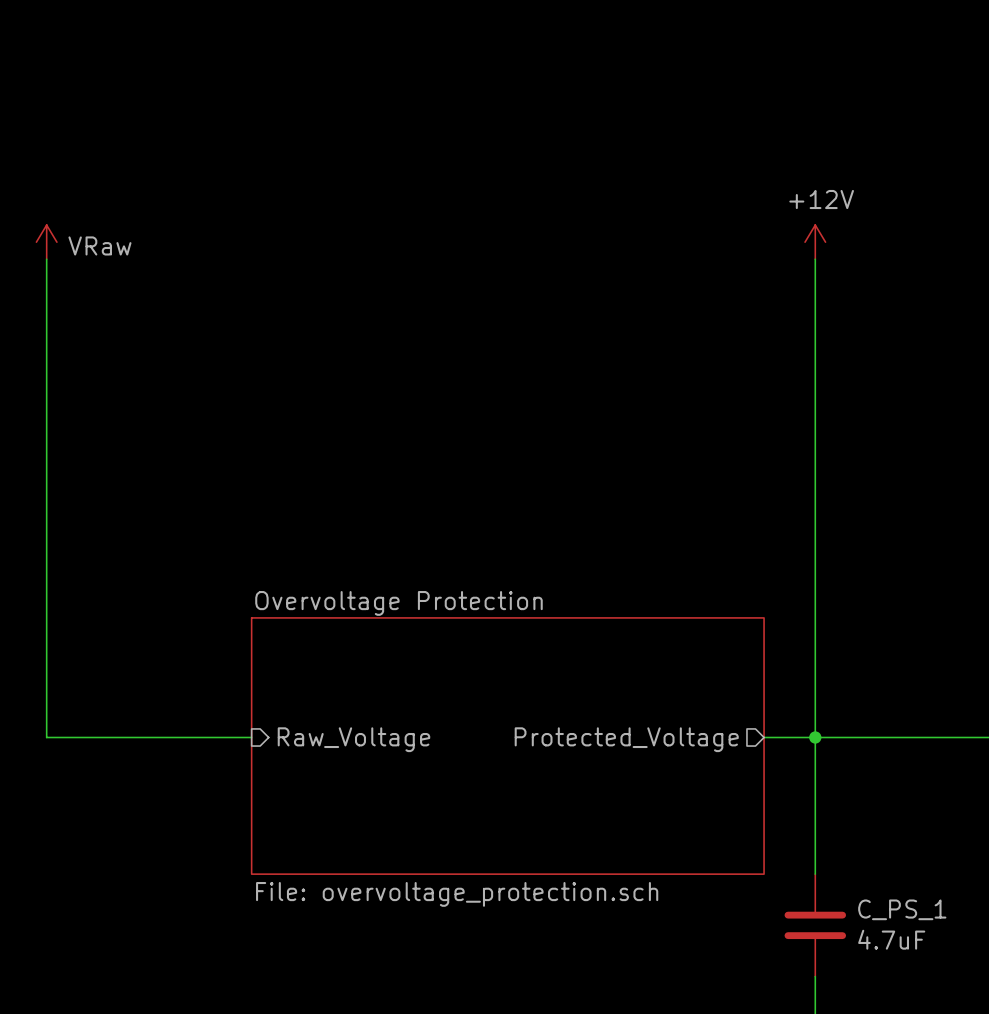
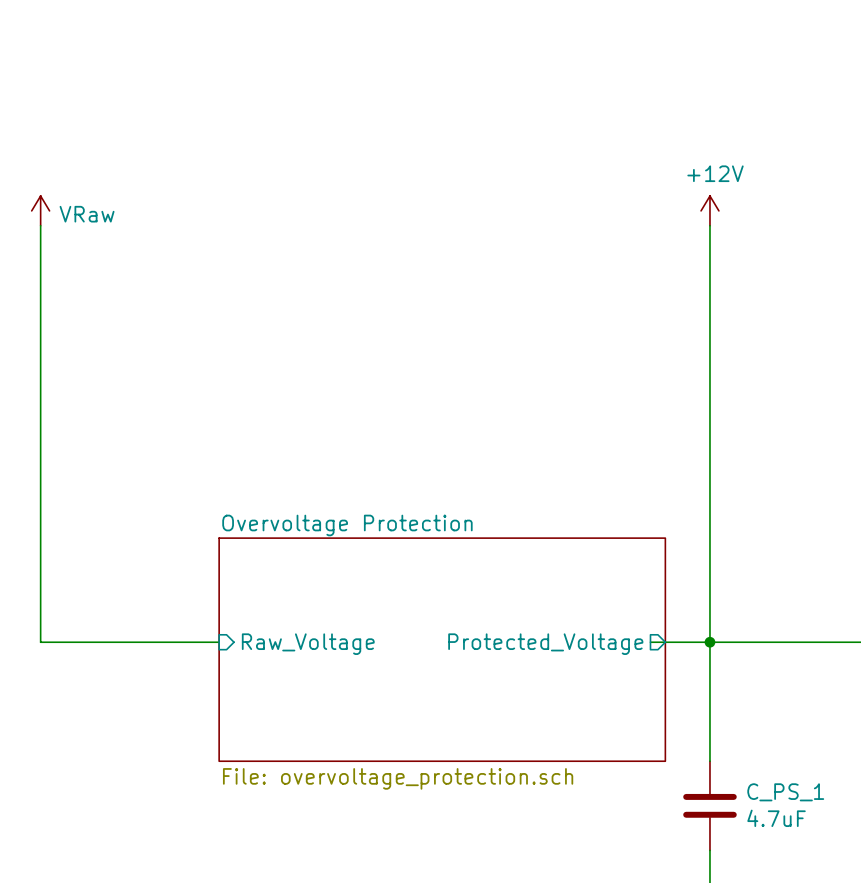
wire: none -> (650, 642) (665, 642)

